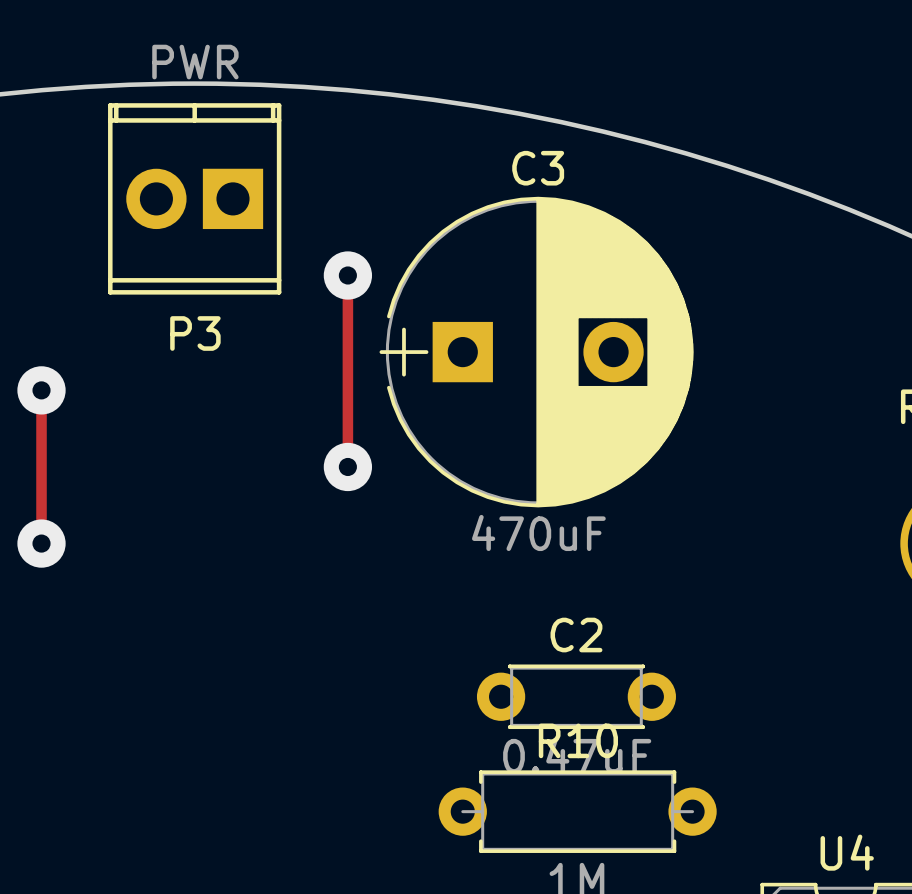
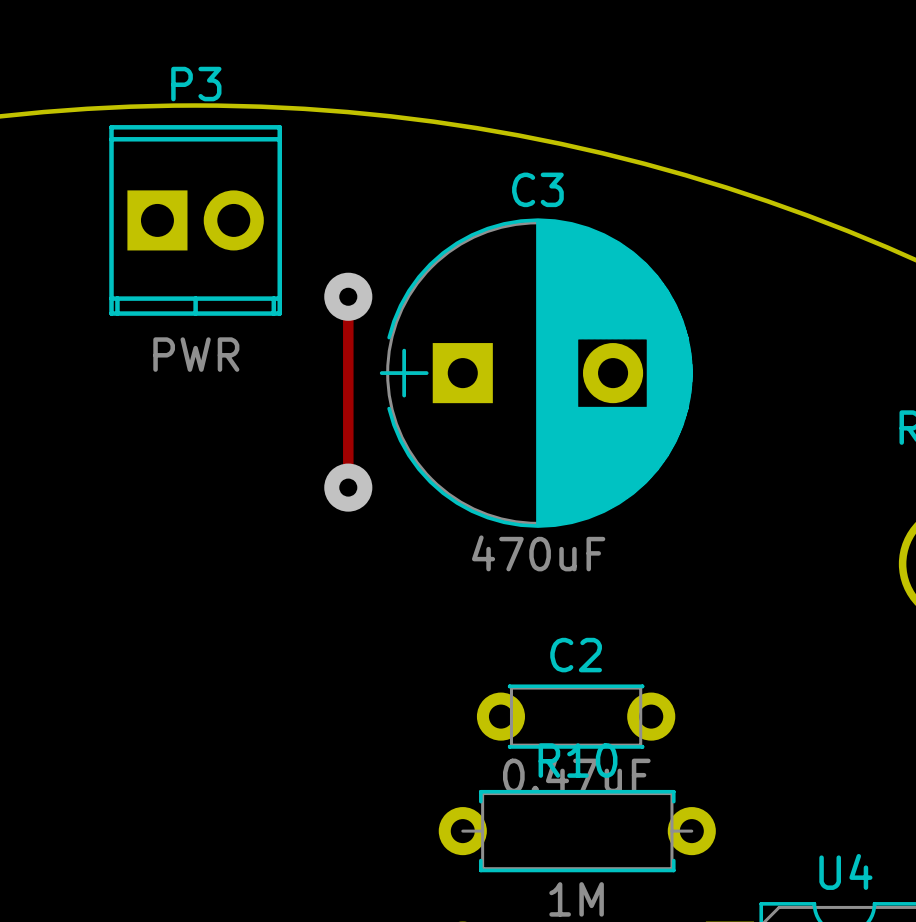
P3 rotation: 0° (194, 198) -> 180° (195, 220)
track: (41, 390) (41, 543) -> none
via: (41, 390) -> none
via: (41, 543) -> none

